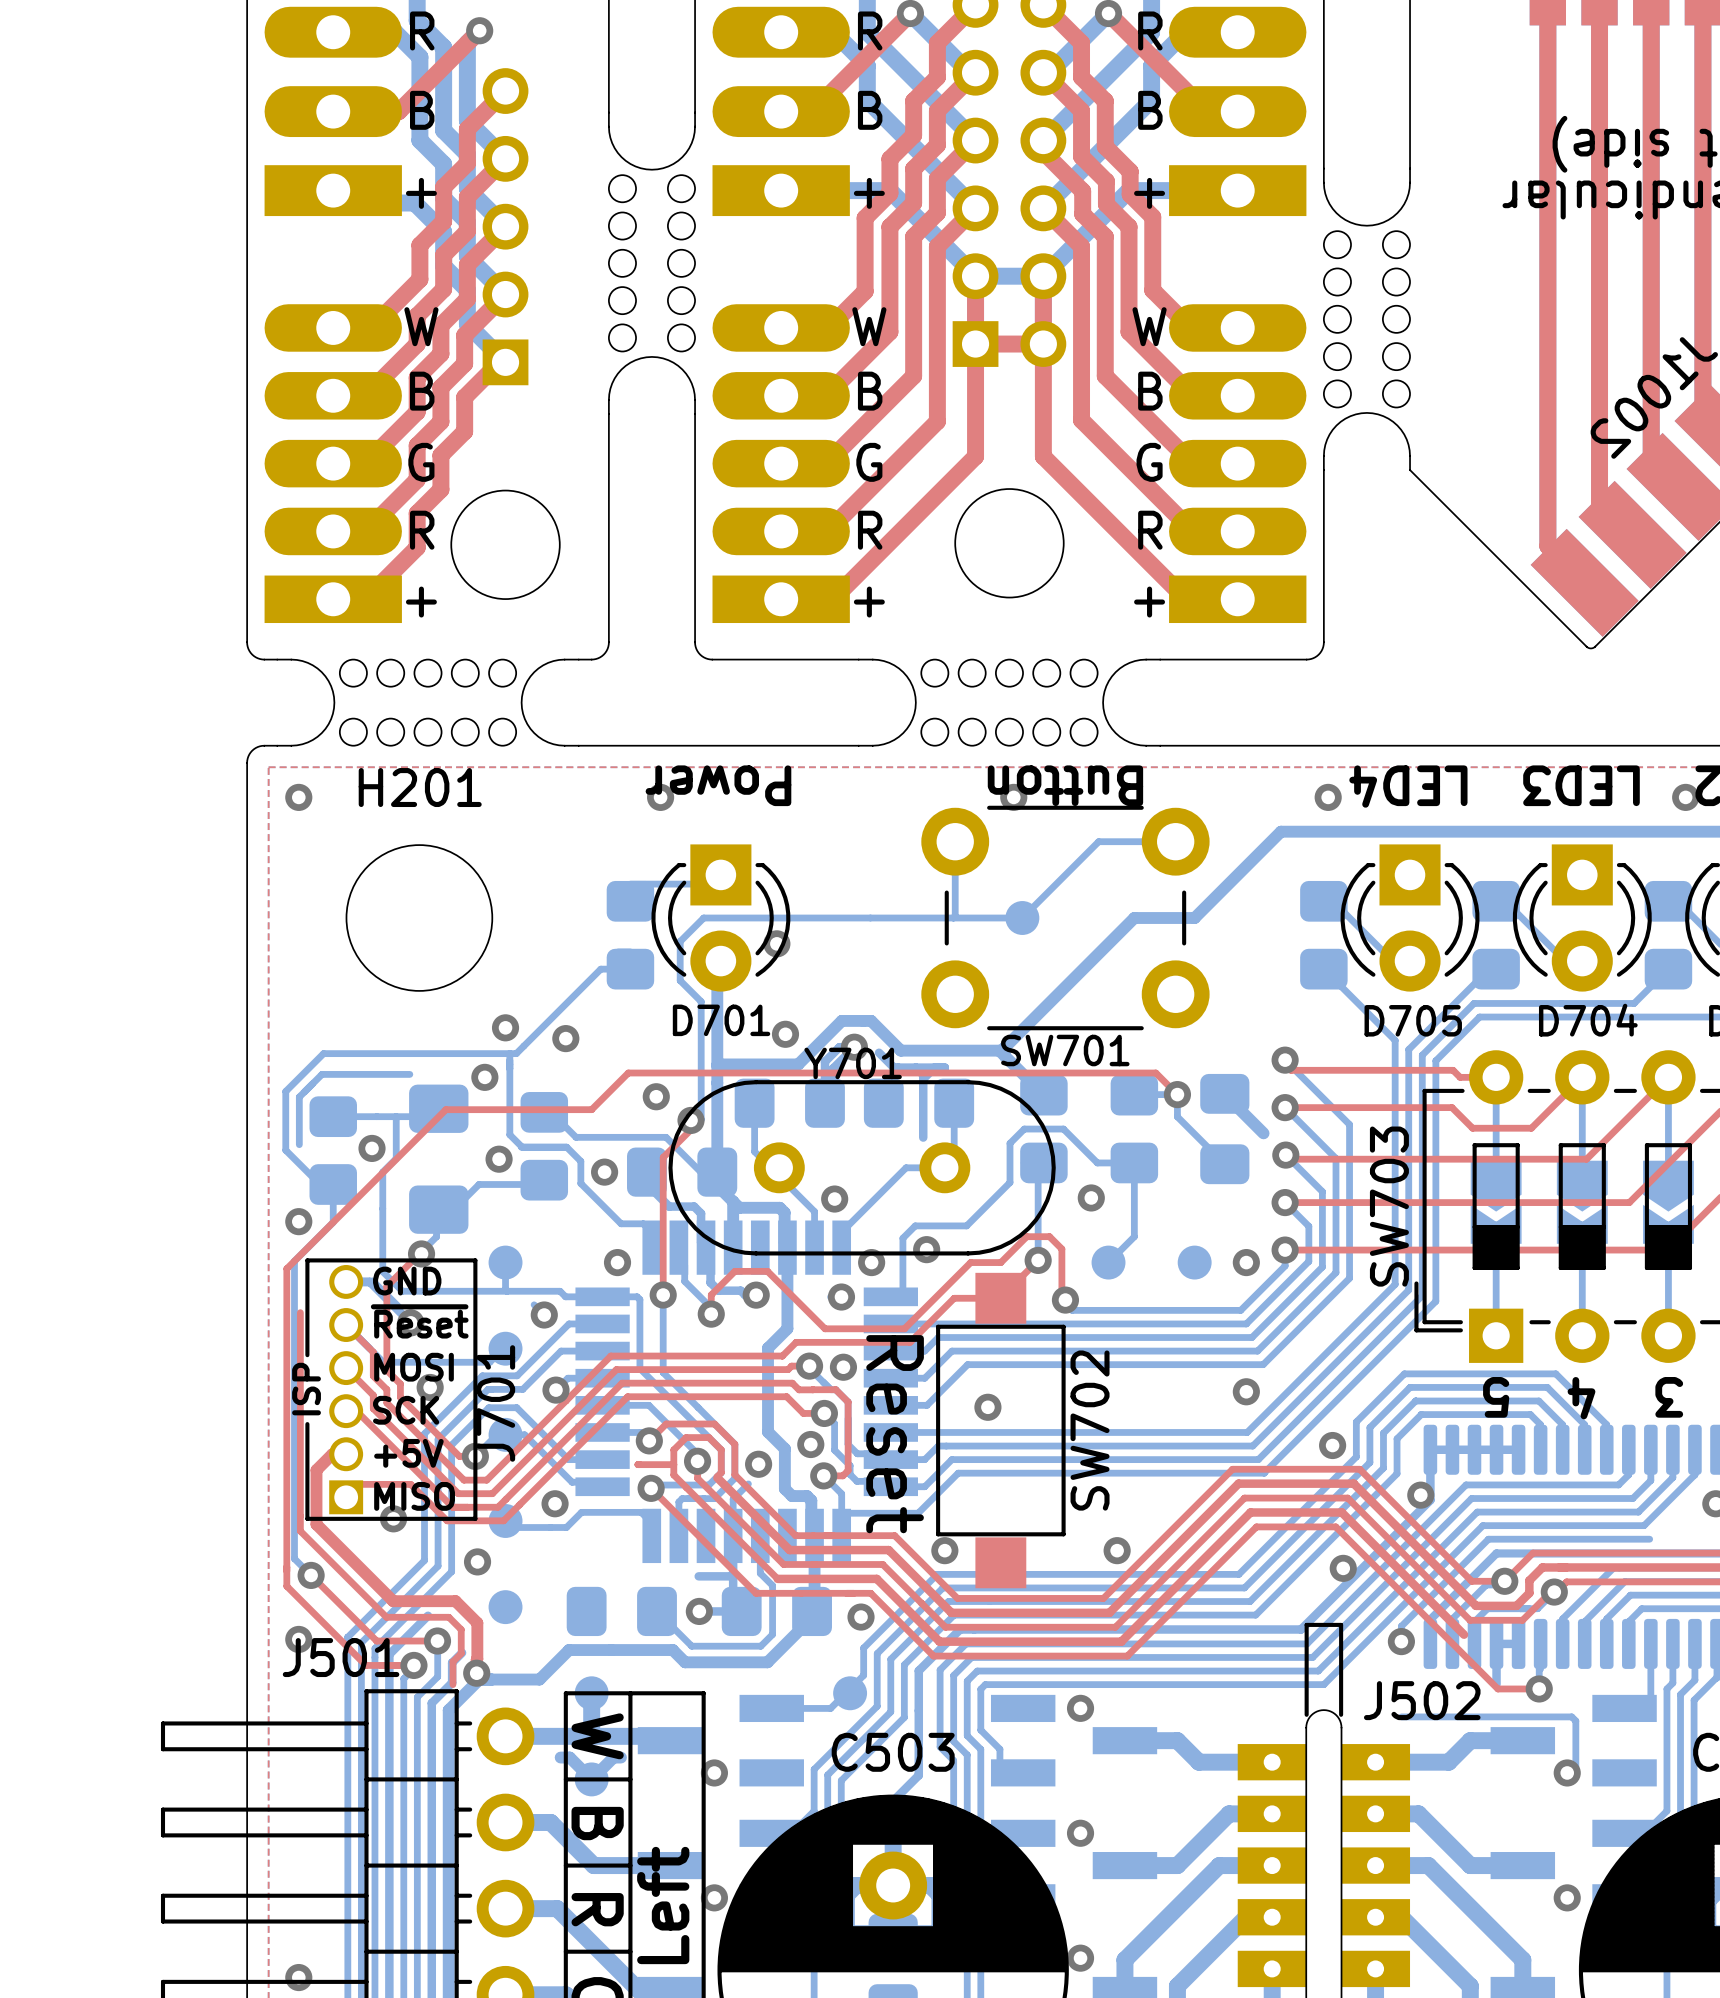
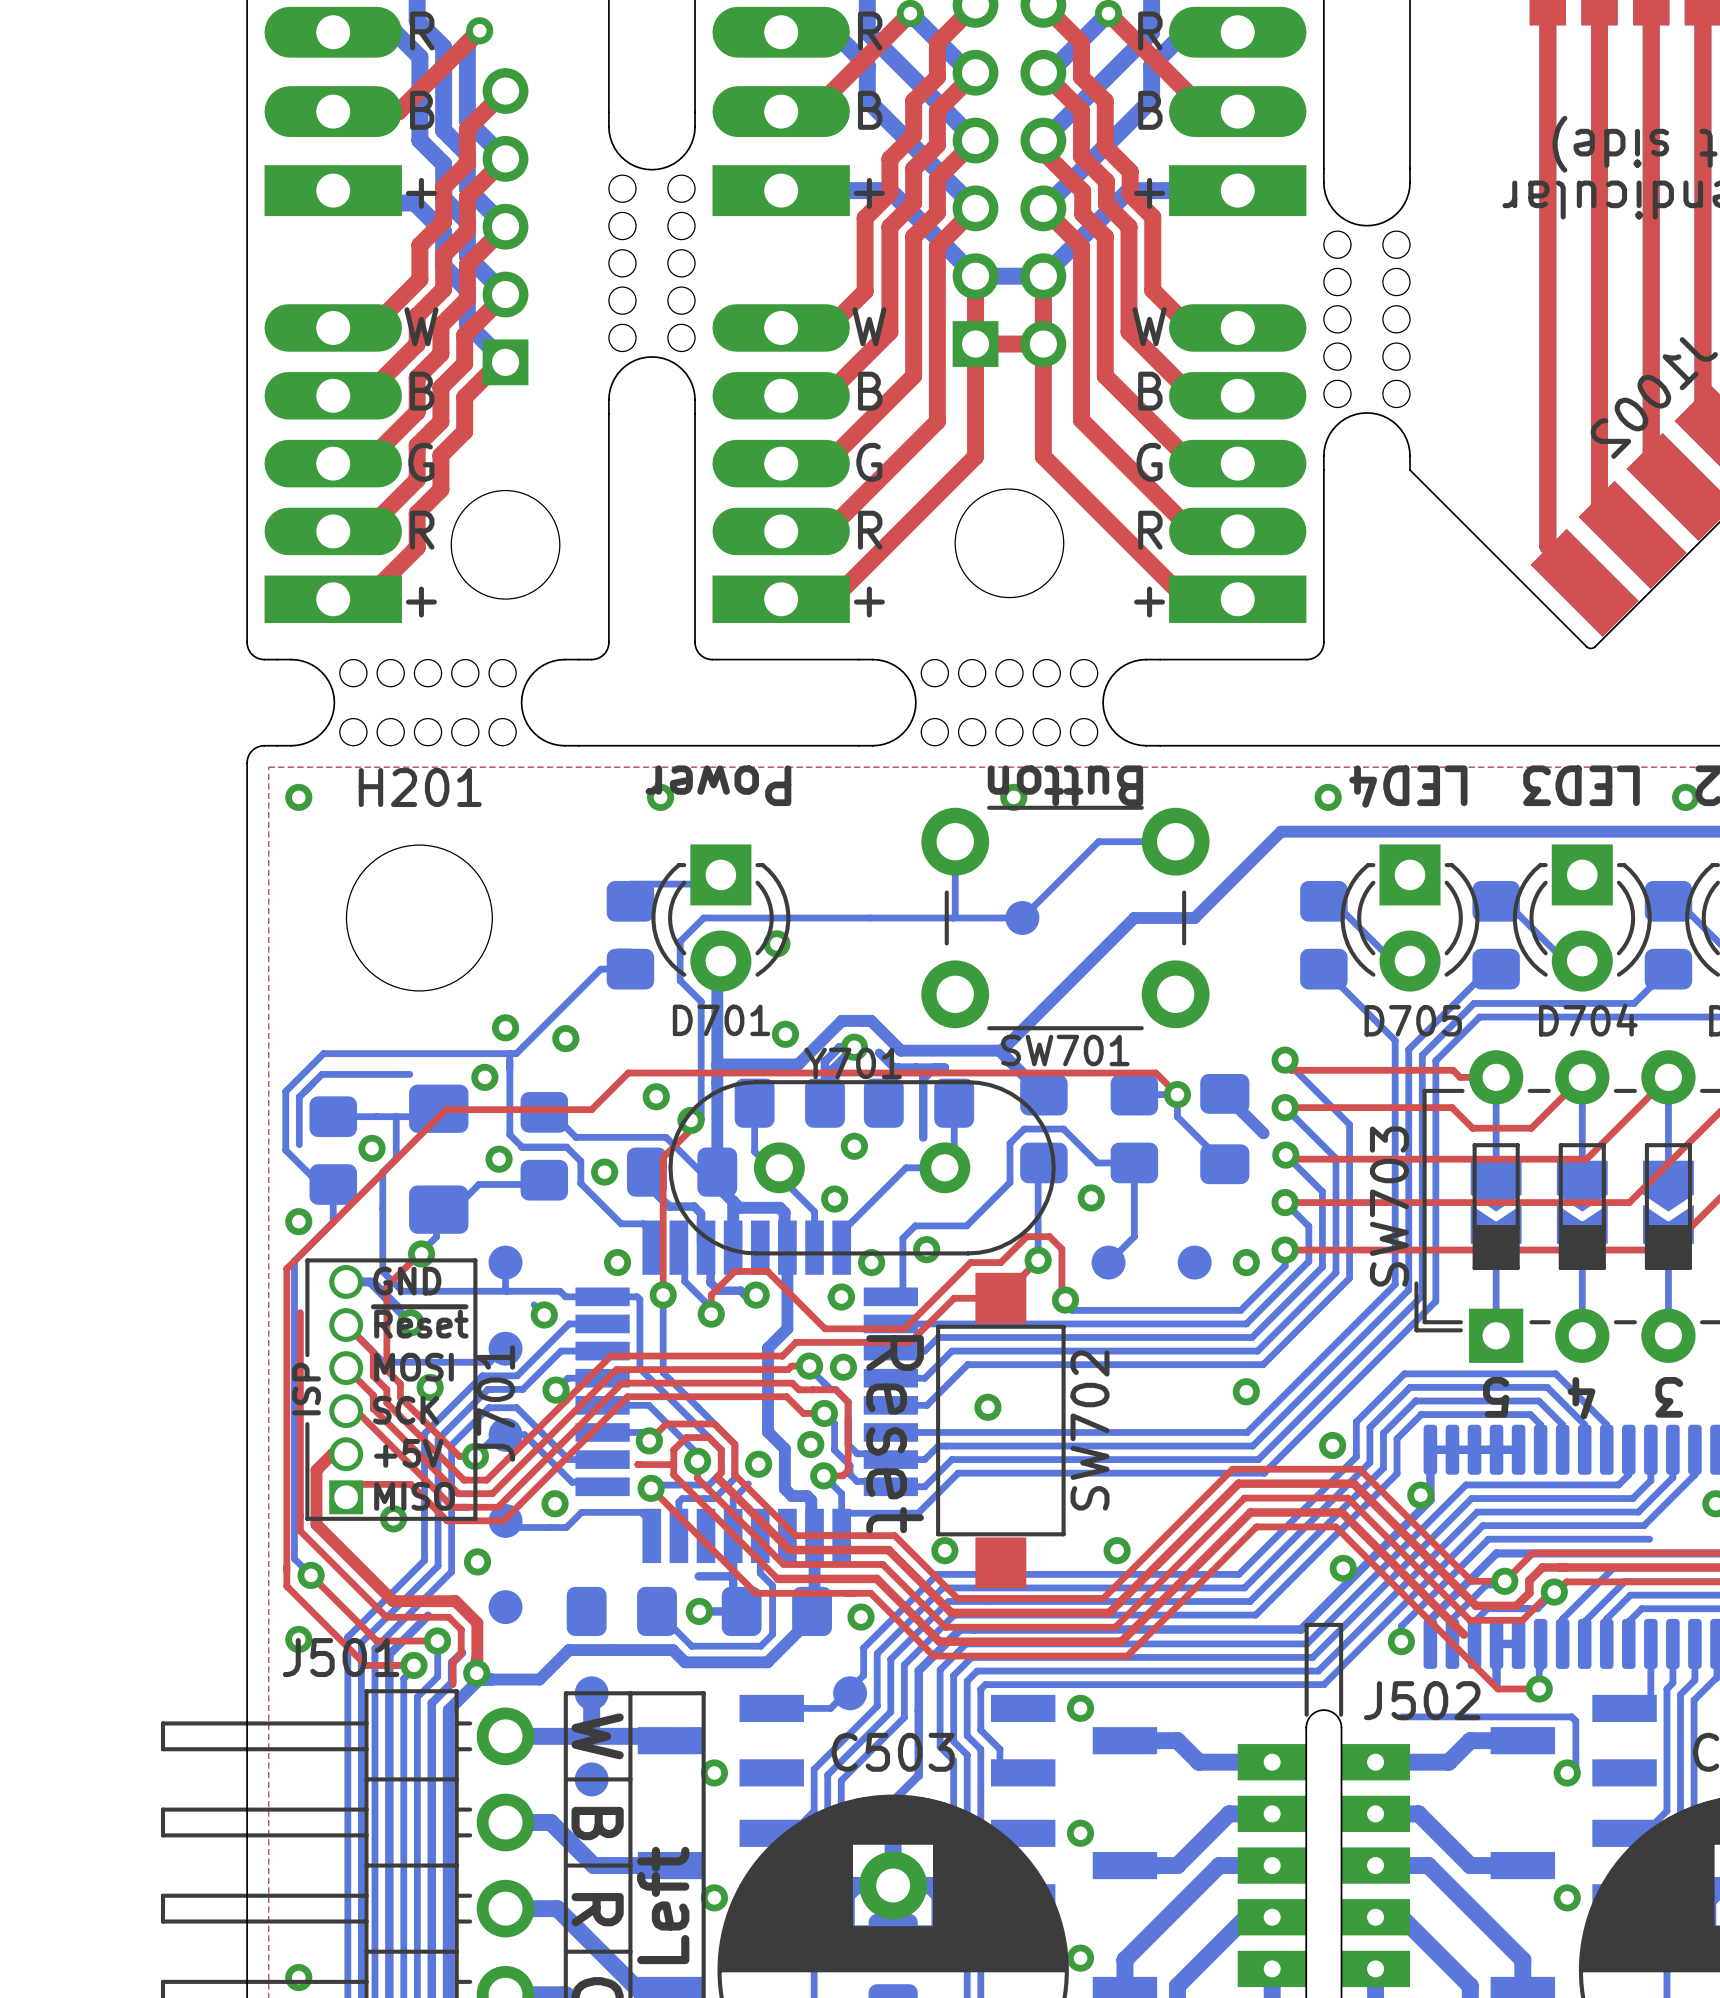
via: none -> (854, 1146)
bottom track: (560, 1757) (569, 1757) (591, 1779) (613, 1757) (620, 1757) -> none

